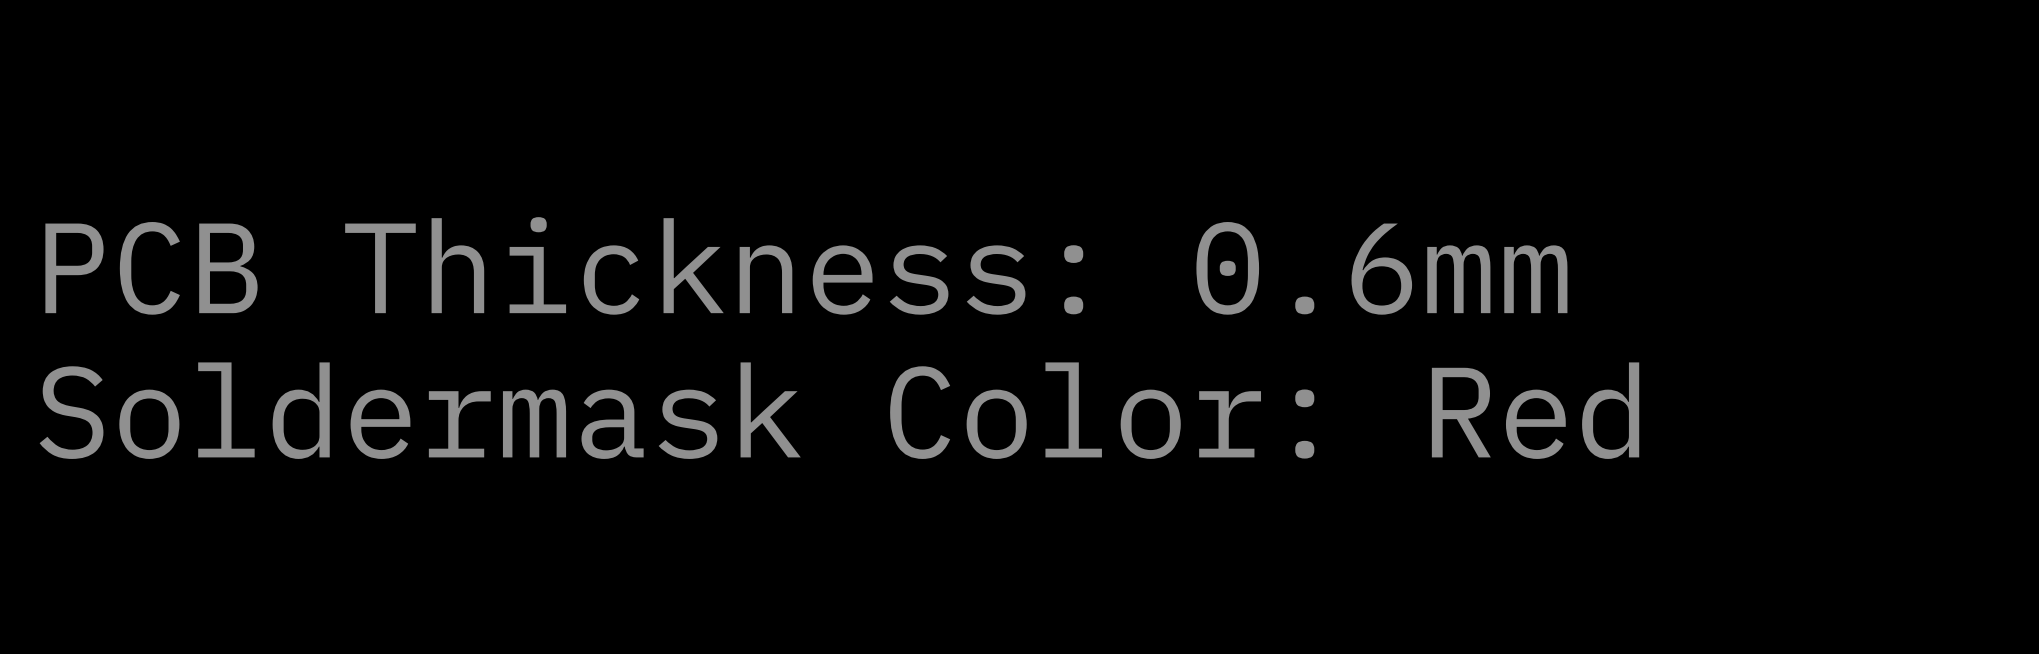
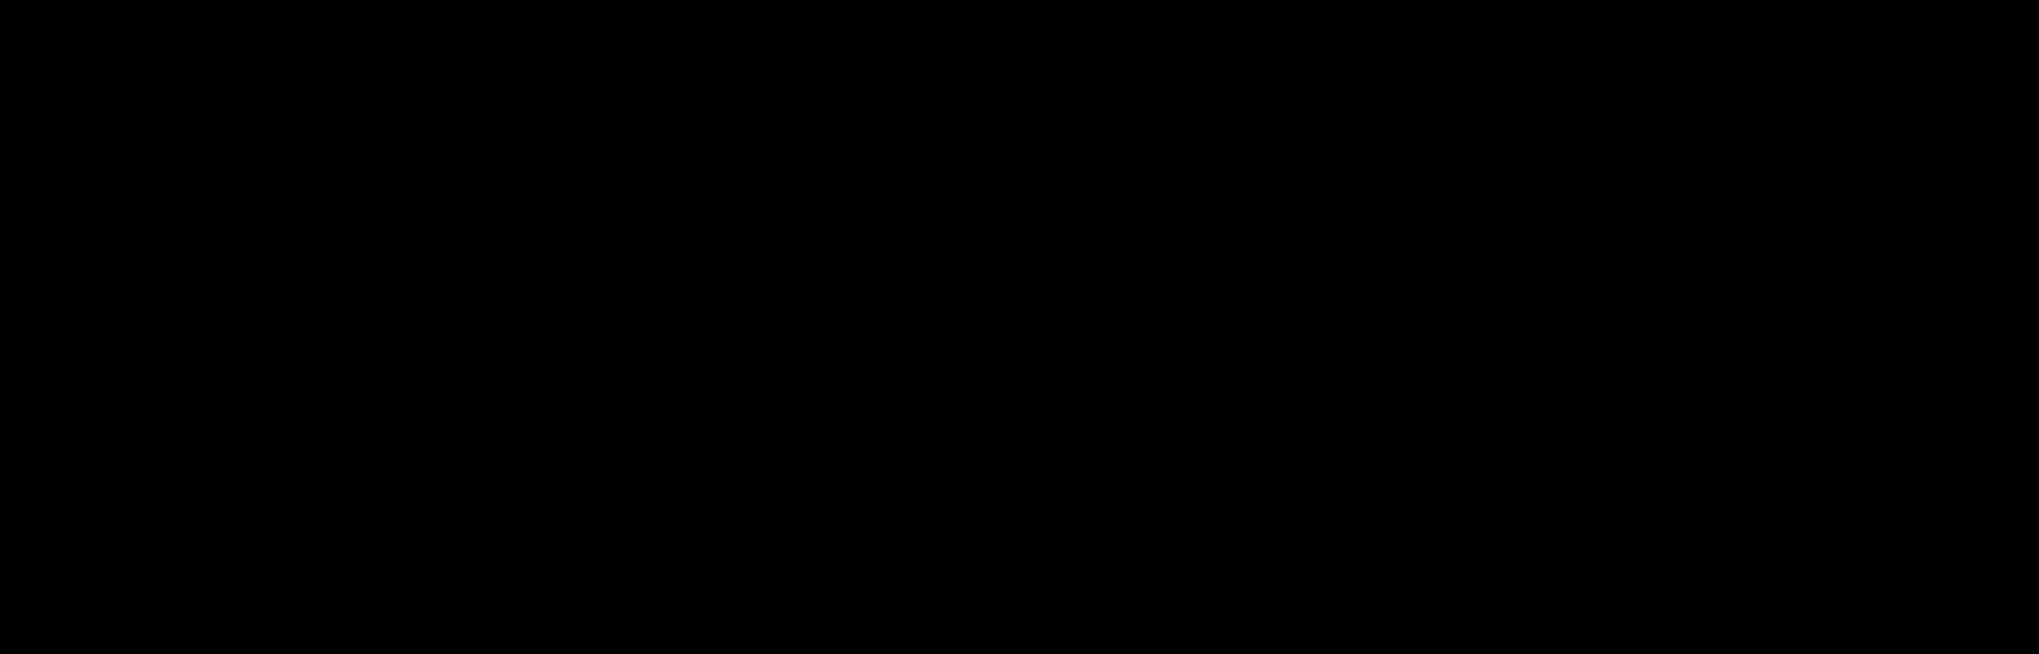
text: PCB Thickness: 0.6mm (806, 265) -> none
text: Soldermask Color: Red (839, 410) -> none

